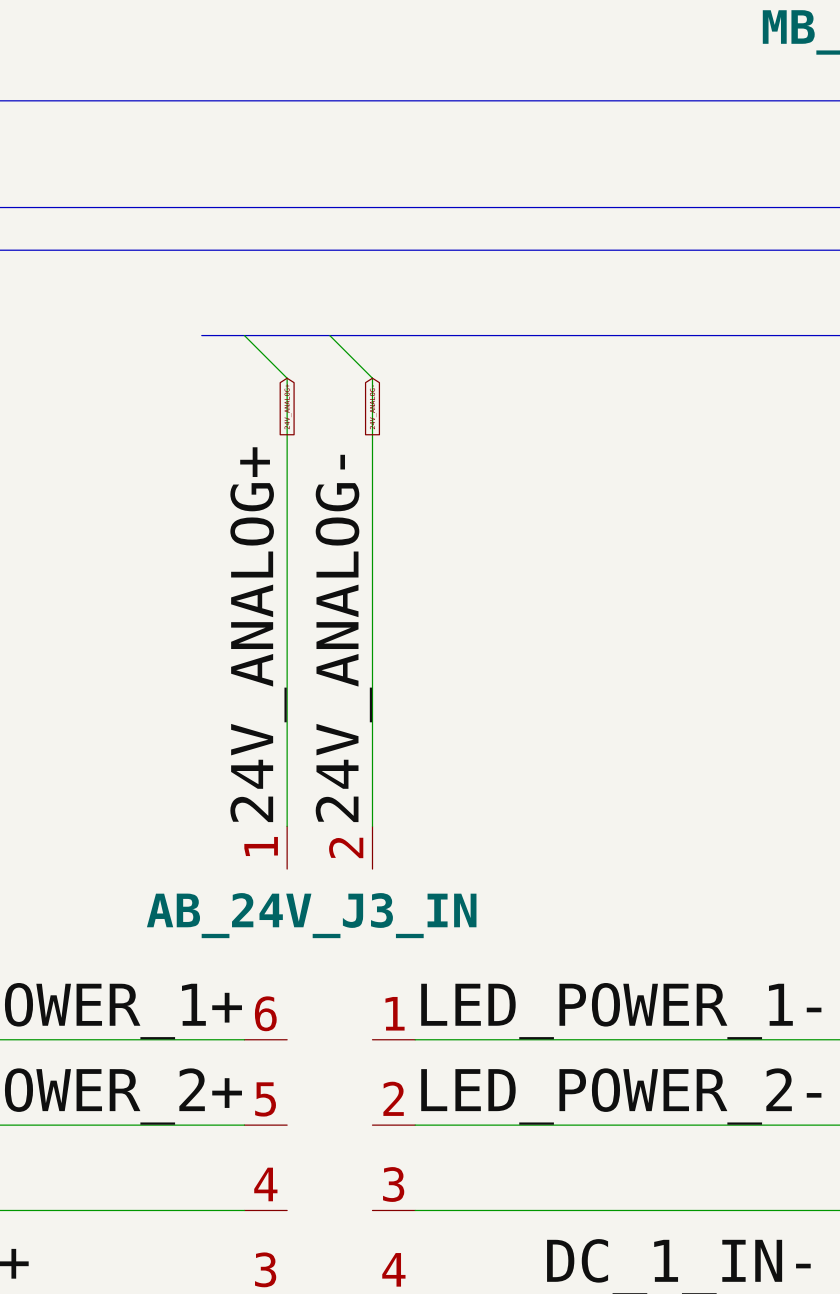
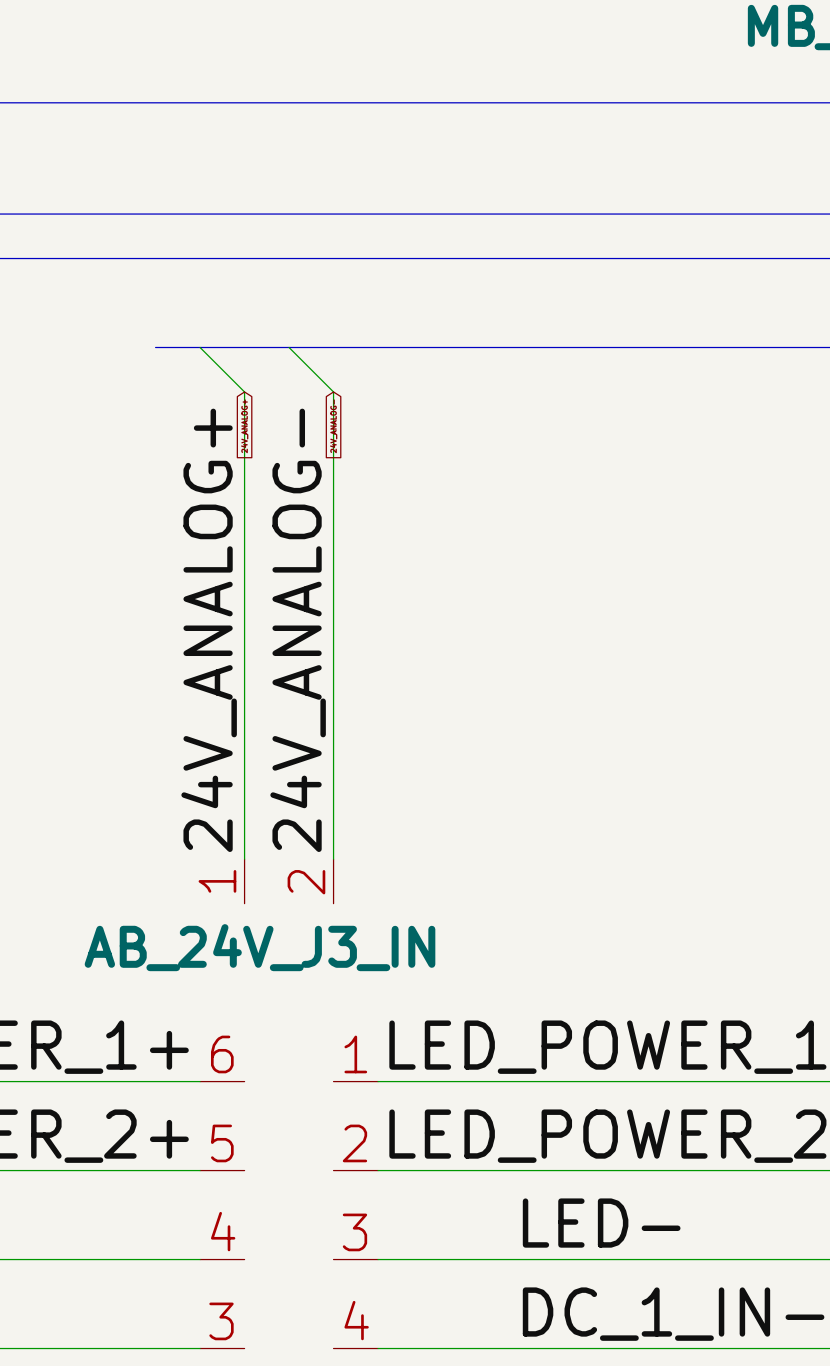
label: none -> LED- (601, 1223)

